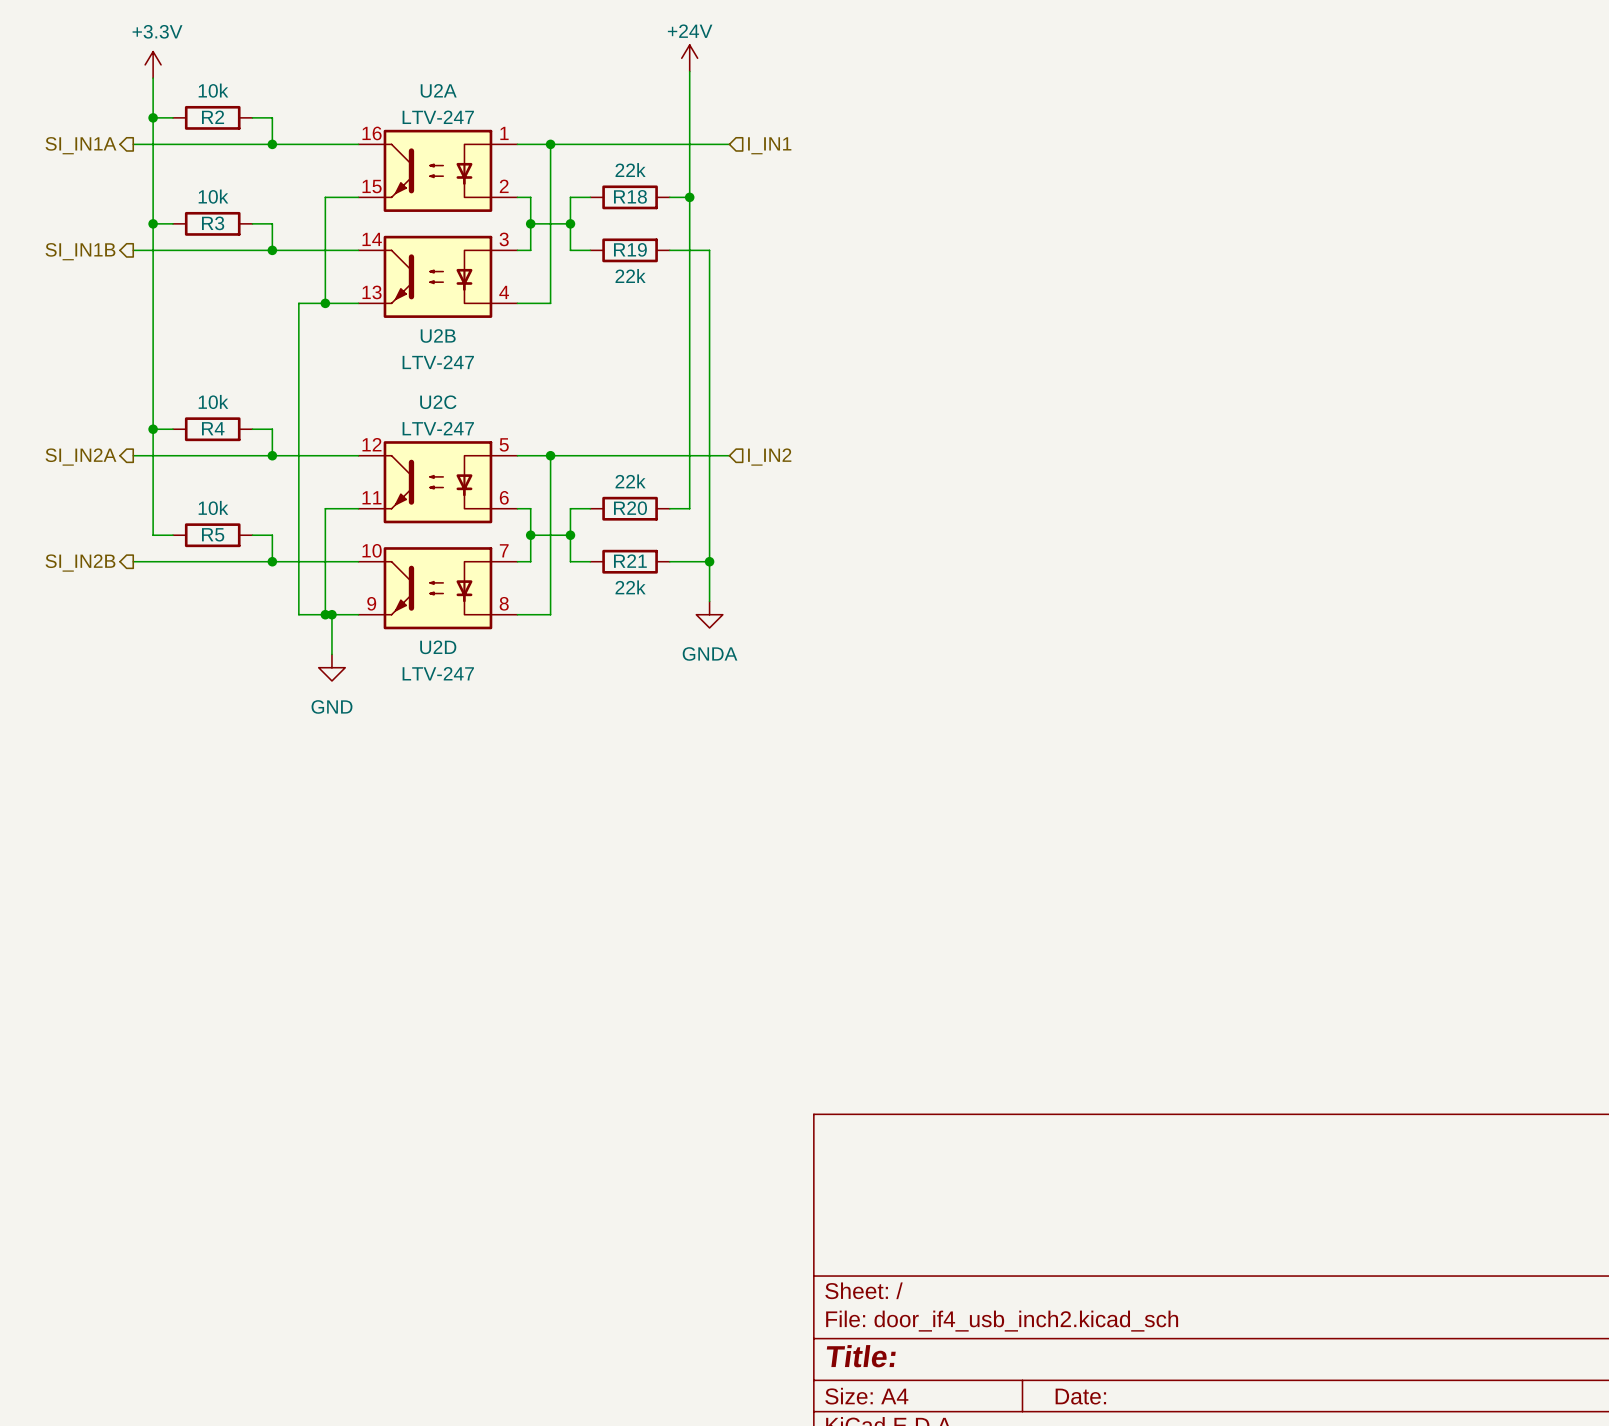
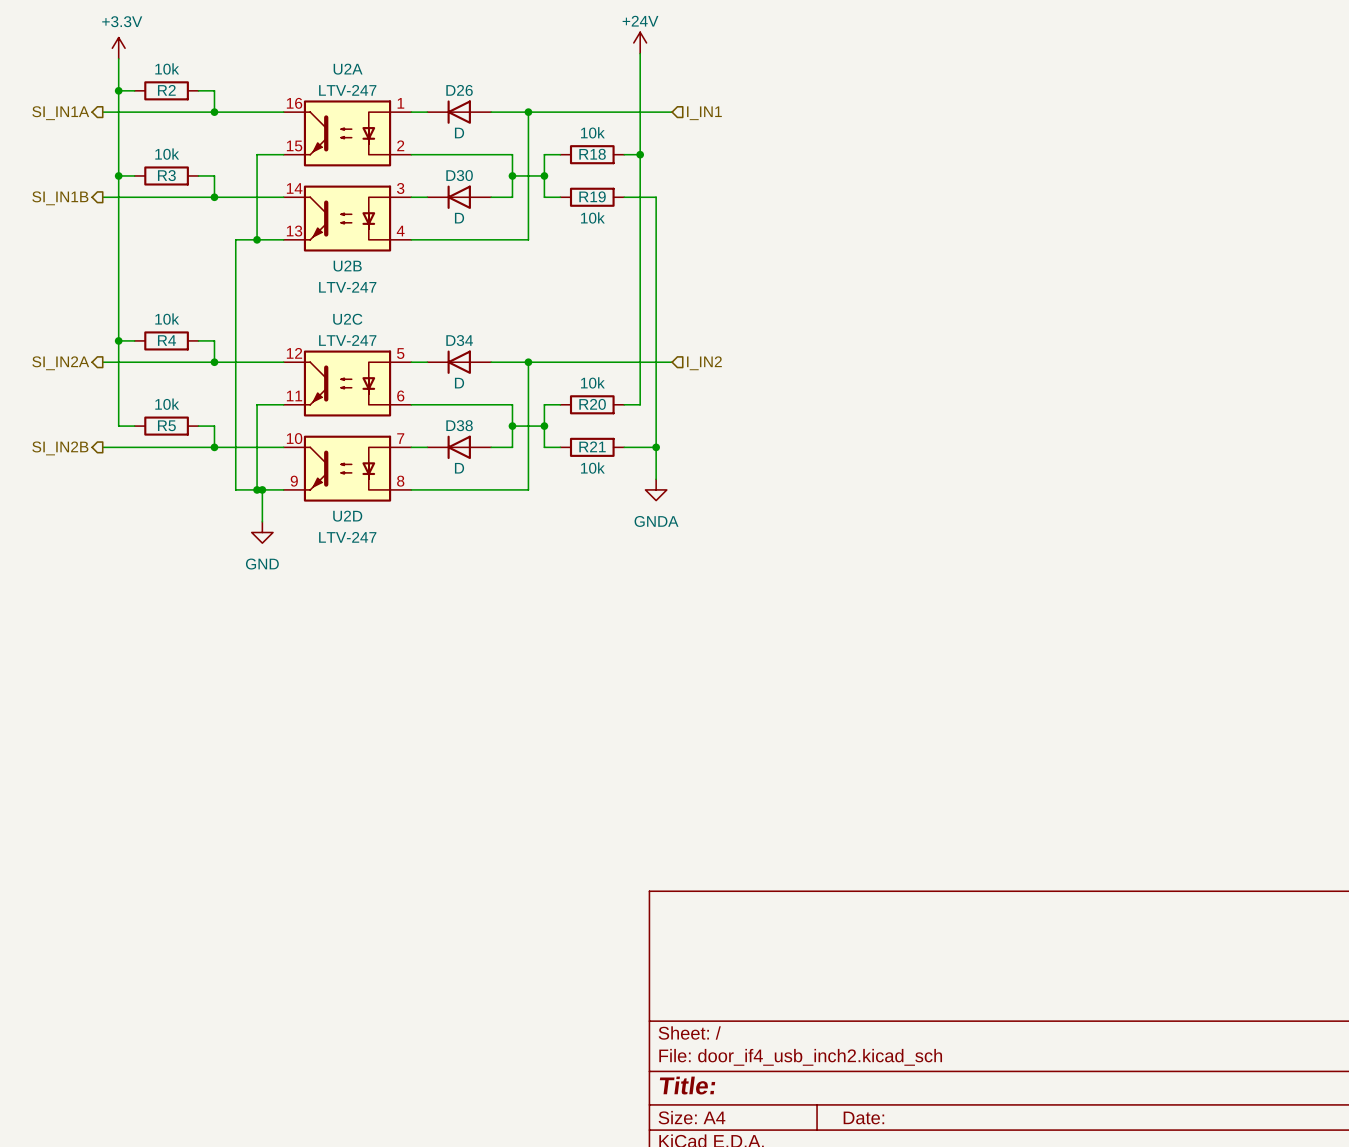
power symbol position: +24V (689, 58) -> +24V (640, 42)
wire: (689, 71) (689, 508) -> (560, 404) (549, 404)
wire: none -> (640, 53) (640, 404) (624, 404)
wire: (550, 144) (550, 303) -> (528, 112) (528, 239) (437, 239)
junction: (550, 144) -> none
D26: none -> D (459, 112)
junction: none -> (528, 112)
wire: none -> (581, 112) (672, 112)
hierarchical label position: I_IN1 (769, 145) -> I_IN1 (704, 113)
R18 value: 22k (630, 170) -> 10k (592, 132)
wire: (530, 197) (530, 250) -> (427, 197) (422, 197)
wire: (570, 197) (570, 250) (590, 250) -> (453, 154) (422, 154)
wire: none -> (469, 154) (512, 154) (512, 197) (491, 197)
R18 position: (630, 197) -> (592, 154)
wire: (669, 197) (683, 197) -> (544, 197) (544, 154)
junction: (689, 197) -> none
wire: none -> (624, 154) (640, 154)
junction: none -> (640, 154)
wire: (530, 223) (570, 223) -> (512, 175) (544, 175)
junction: (530, 223) -> none
junction: (570, 223) -> none
junction: none -> (512, 175)
junction: none -> (544, 175)
D30: none -> D (459, 197)
R19 position: (630, 250) -> (592, 197)
wire: (669, 250) (683, 250) -> (549, 154) (560, 154)
wire: (702, 250) (709, 250) (709, 601) -> none
wire: none -> (624, 197) (656, 197) (656, 479)
R19 value: 22k (630, 276) -> 10k (592, 217)
wire: (550, 455) (550, 614) -> (528, 362) (528, 489) (437, 489)
junction: (550, 455) -> none
D34: none -> D (459, 362)
junction: none -> (528, 362)
wire: none -> (581, 362) (672, 362)
hierarchical label position: I_IN2 (769, 457) -> I_IN2 (704, 363)
R20 value: 22k (630, 481) -> 10k (592, 382)
wire: (530, 508) (530, 561) -> (427, 447) (422, 447)
wire: (570, 508) (570, 561) (590, 561) -> (453, 404) (422, 404)
wire: none -> (469, 404) (512, 404) (512, 447) (491, 447)
R20 position: (630, 508) -> (592, 404)
wire: (669, 508) (683, 508) -> (544, 447) (544, 404)
wire: (530, 535) (570, 535) -> (512, 426) (544, 426)
junction: (530, 535) -> none
junction: (570, 535) -> none
junction: none -> (512, 426)
junction: none -> (544, 426)
D38: none -> D (459, 447)
R21 position: (630, 561) -> (592, 447)
wire: (669, 561) (683, 561) -> none
junction: (709, 561) -> none
wire: none -> (624, 447) (656, 447)
junction: none -> (656, 447)
R21 value: 22k (630, 587) -> 10k (592, 468)
power symbol position: GNDA (709, 614) -> GNDA (656, 489)

